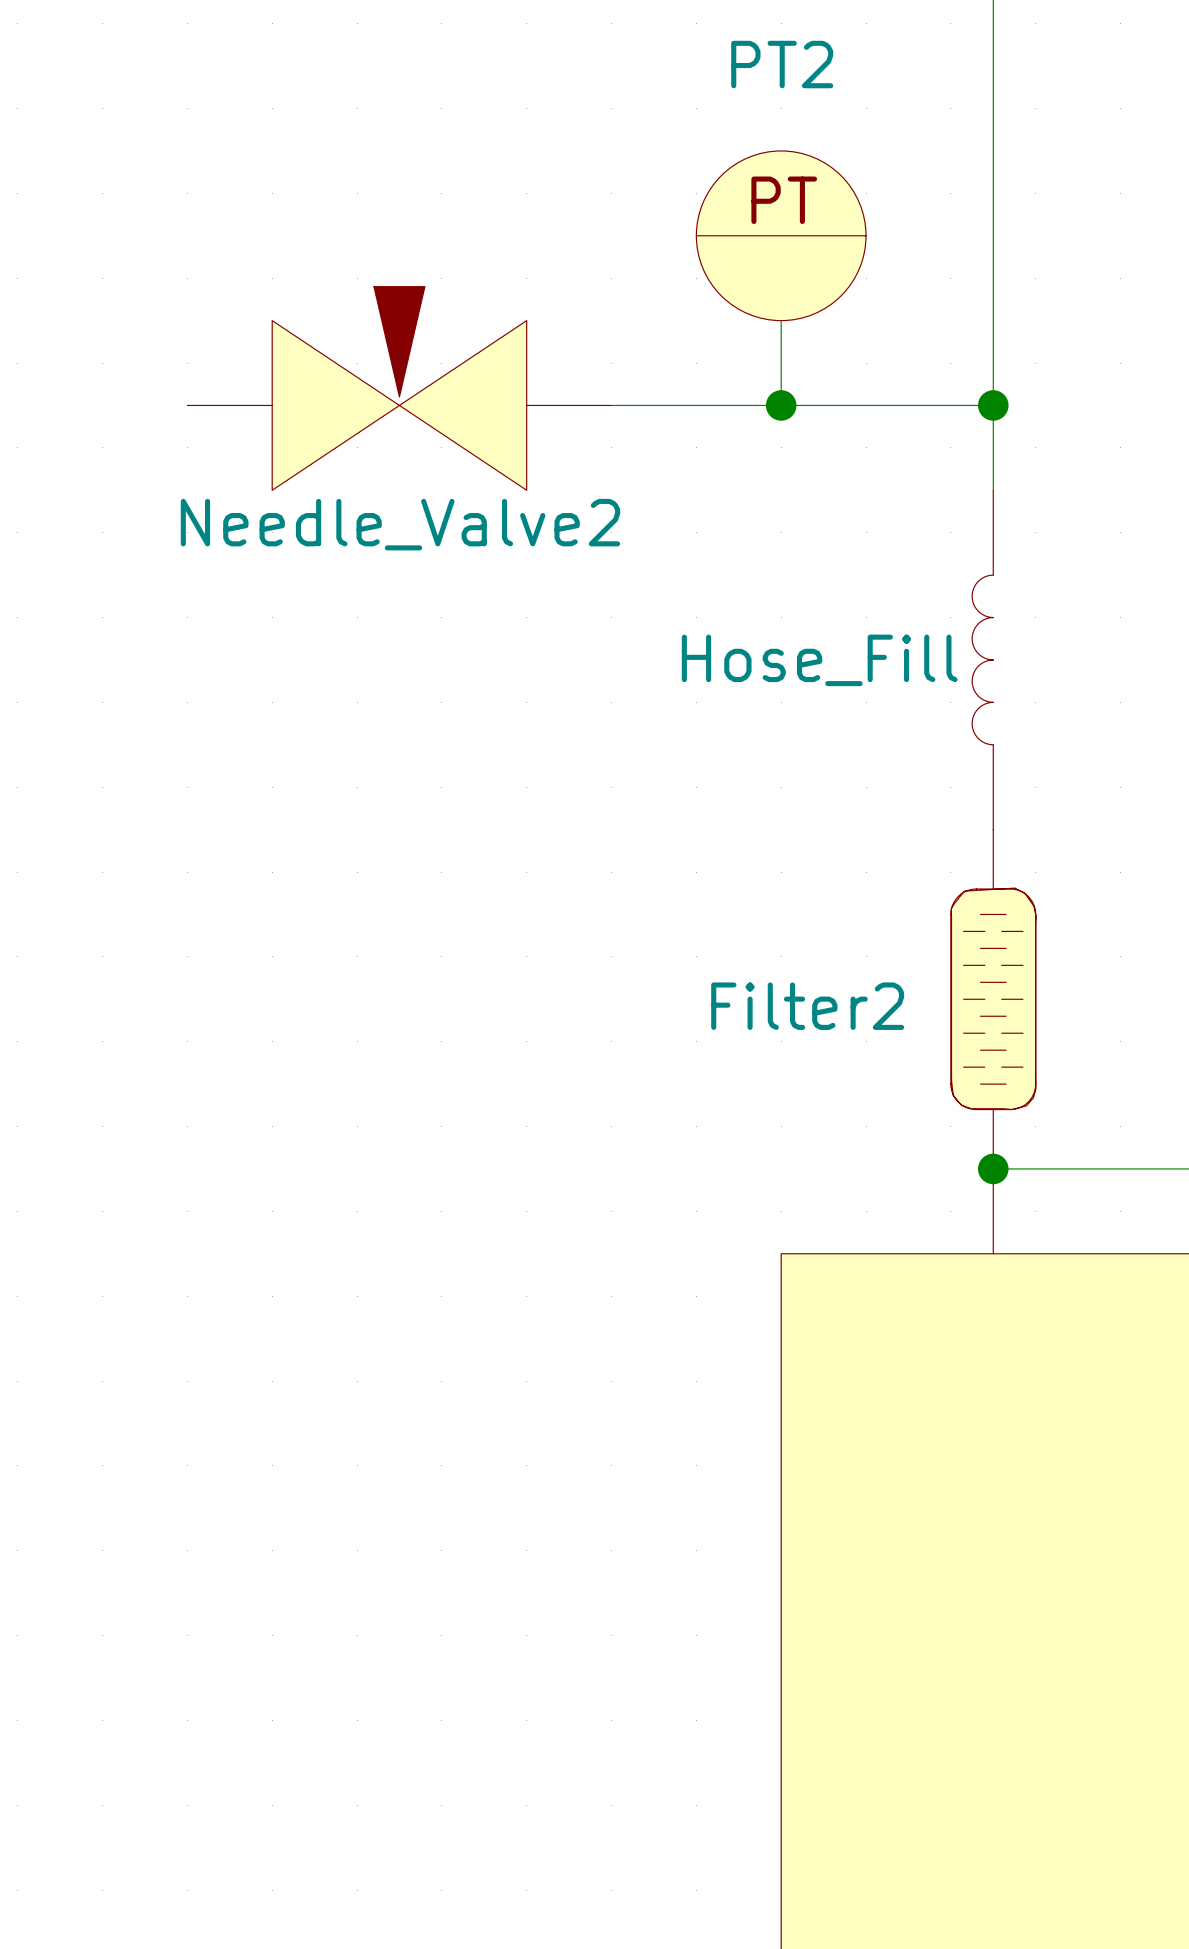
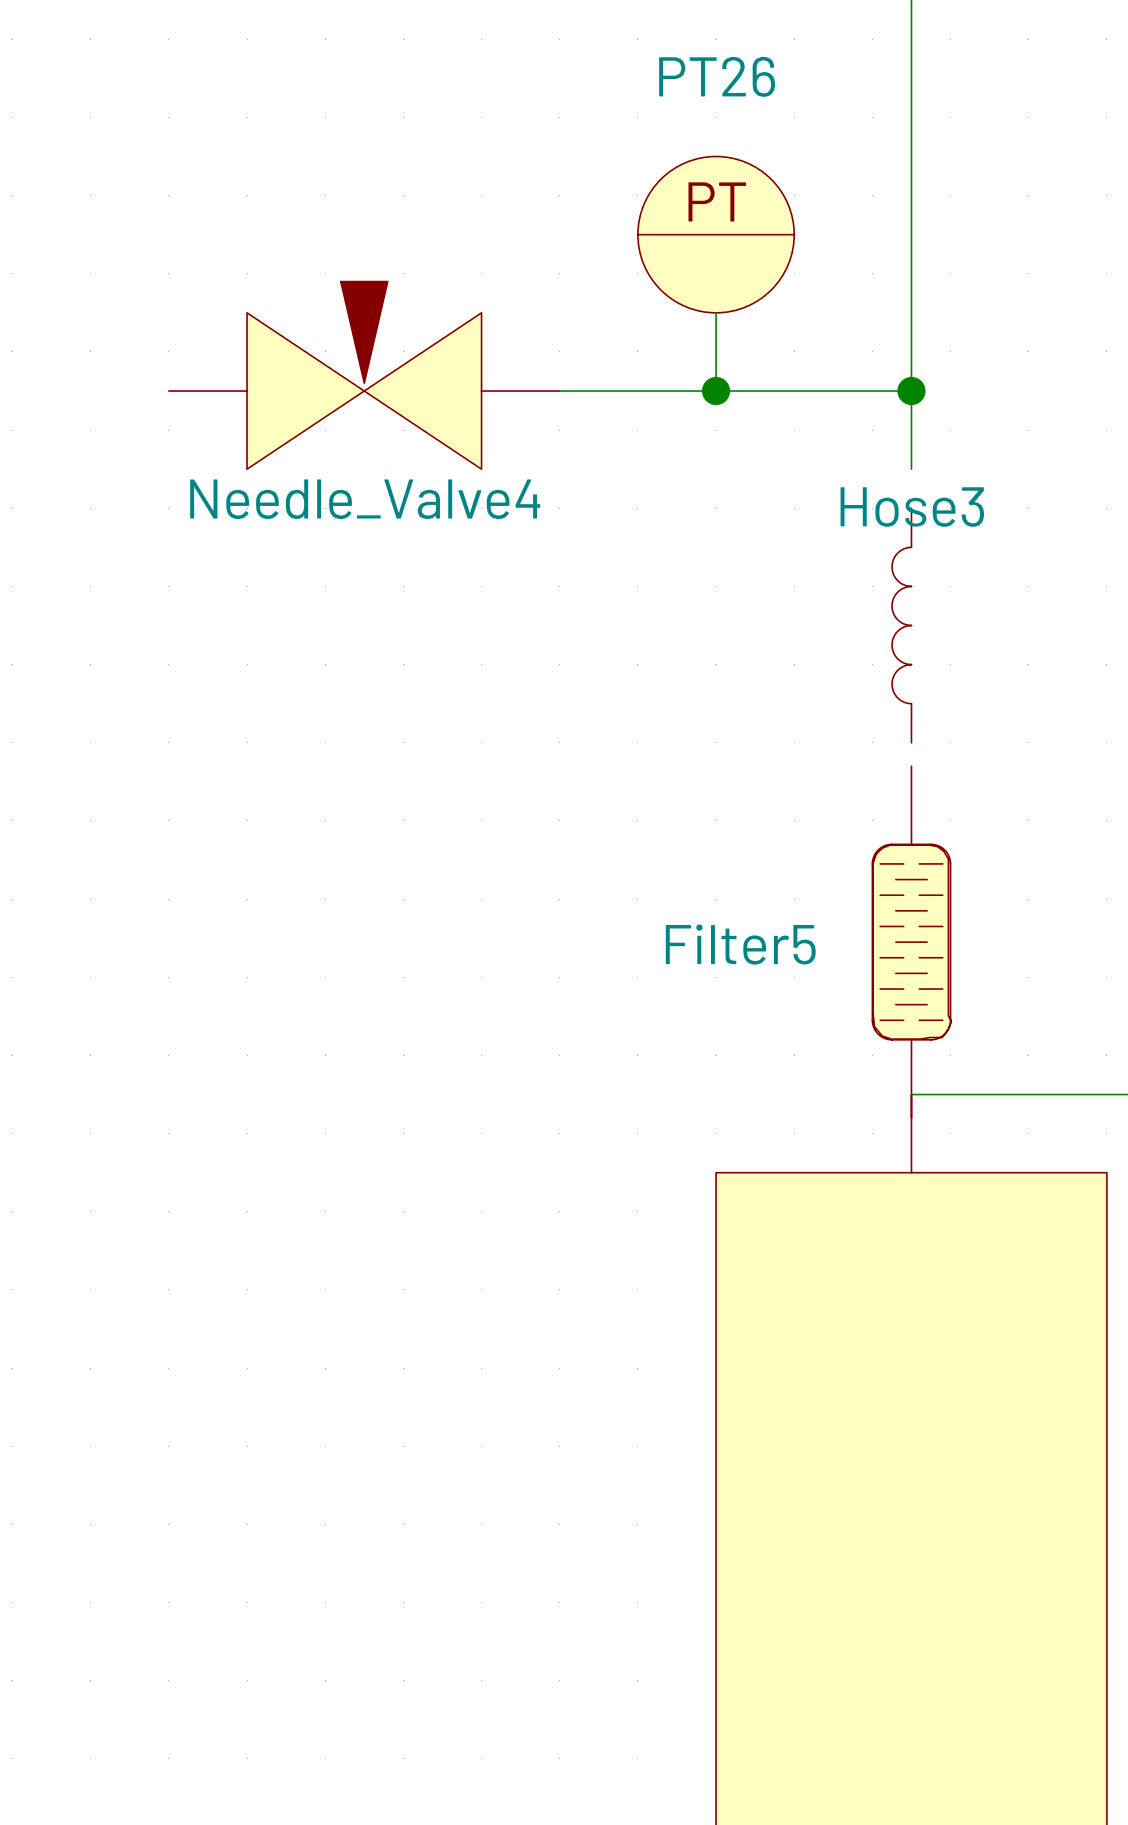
PT2 name: PT2 (782, 64) -> PT26 (717, 76)
Needle_Valve2 name: Needle_Valve2 (400, 524) -> Needle_Valve4 (365, 499)
part: Hose_Fill (982, 659) -> none
Hose3: none -> (901, 625)
Filter2: (993, 999) -> none
Filter5: none -> (911, 942)
junction: (993, 1168) -> none

